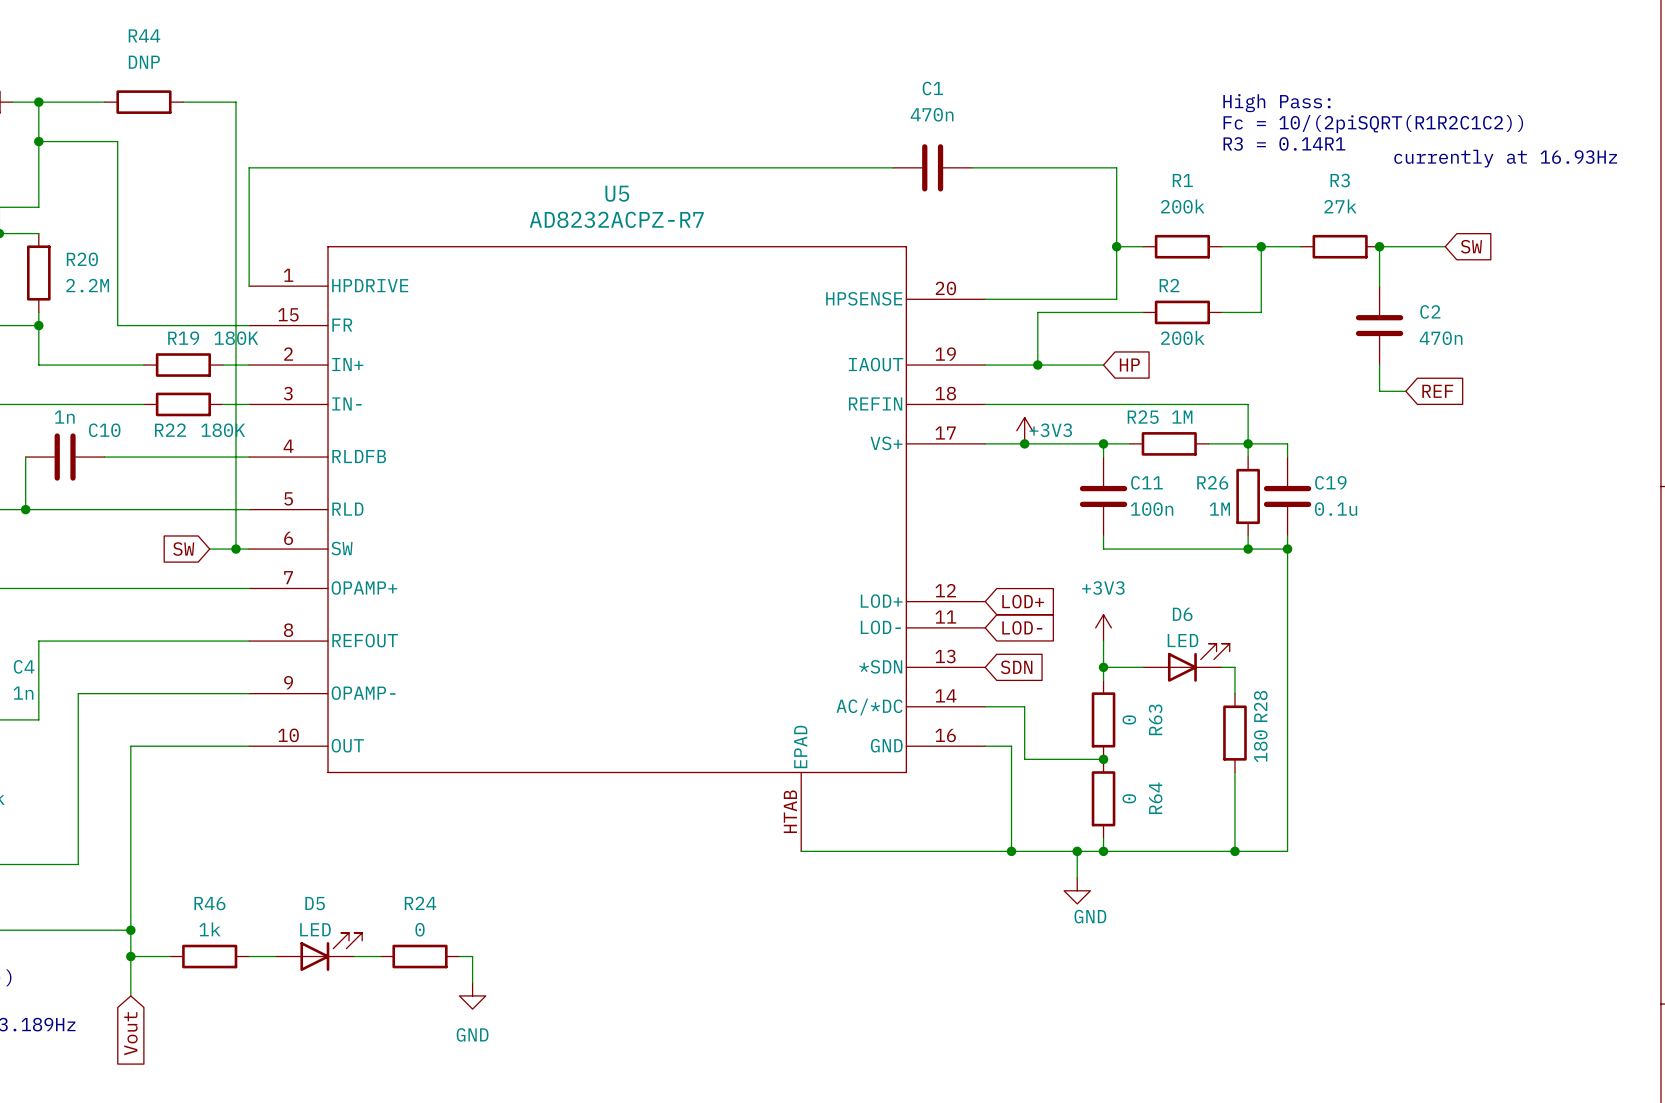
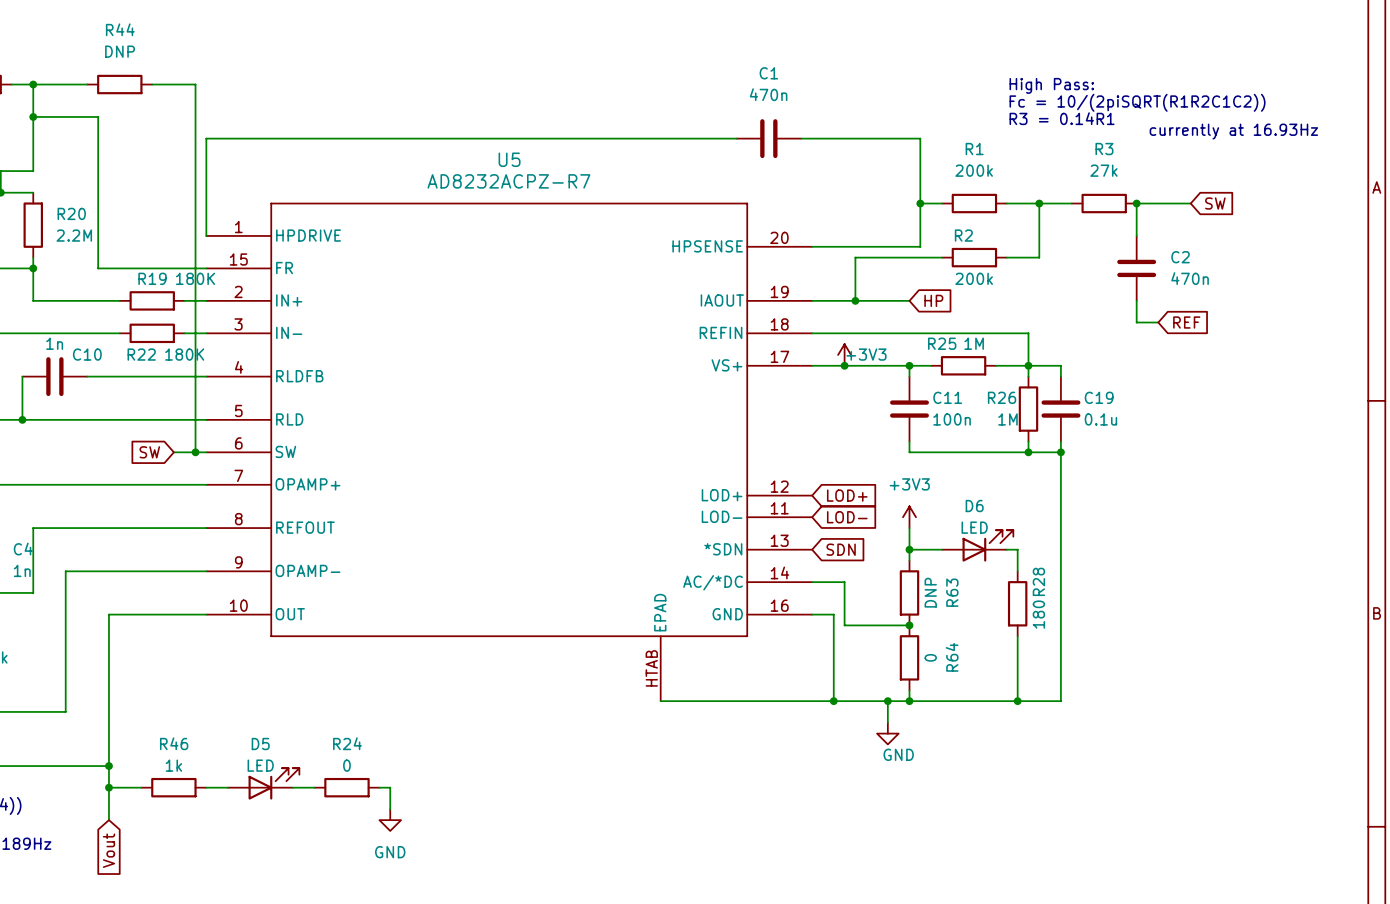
R63 value: 0 (1129, 719) -> DNP (930, 592)

